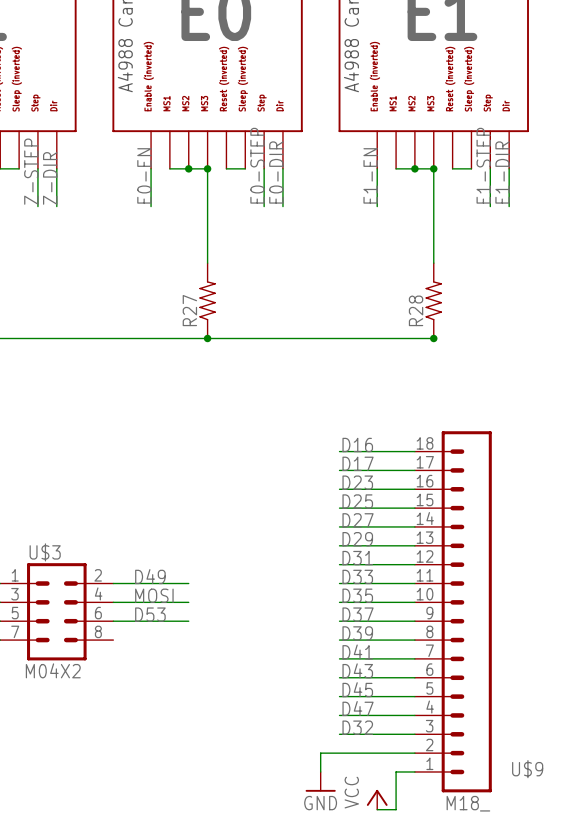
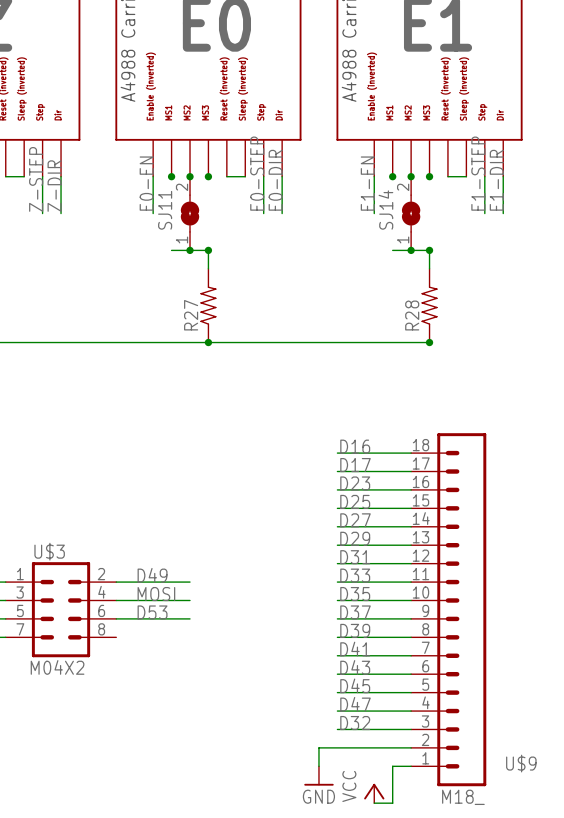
wire: (169, 168) (207, 168) (207, 244) -> (171, 250) (208, 250)
junction: none -> (171, 176)
wire: (396, 168) (433, 168) (433, 244) -> (392, 250) (429, 250)
junction: none -> (392, 176)
SJ11: none -> (190, 213)
SJ14: none -> (411, 213)
junction: none -> (190, 250)
junction: none -> (208, 250)
junction: none -> (411, 250)
junction: none -> (429, 250)

